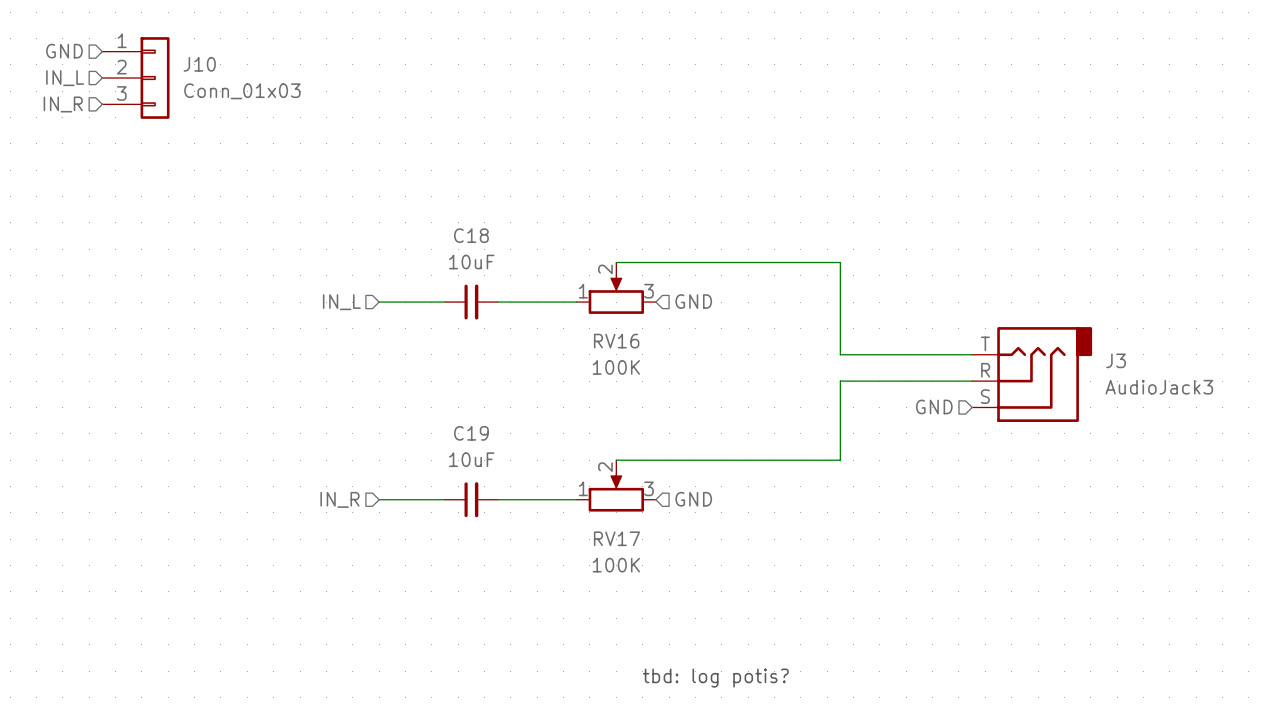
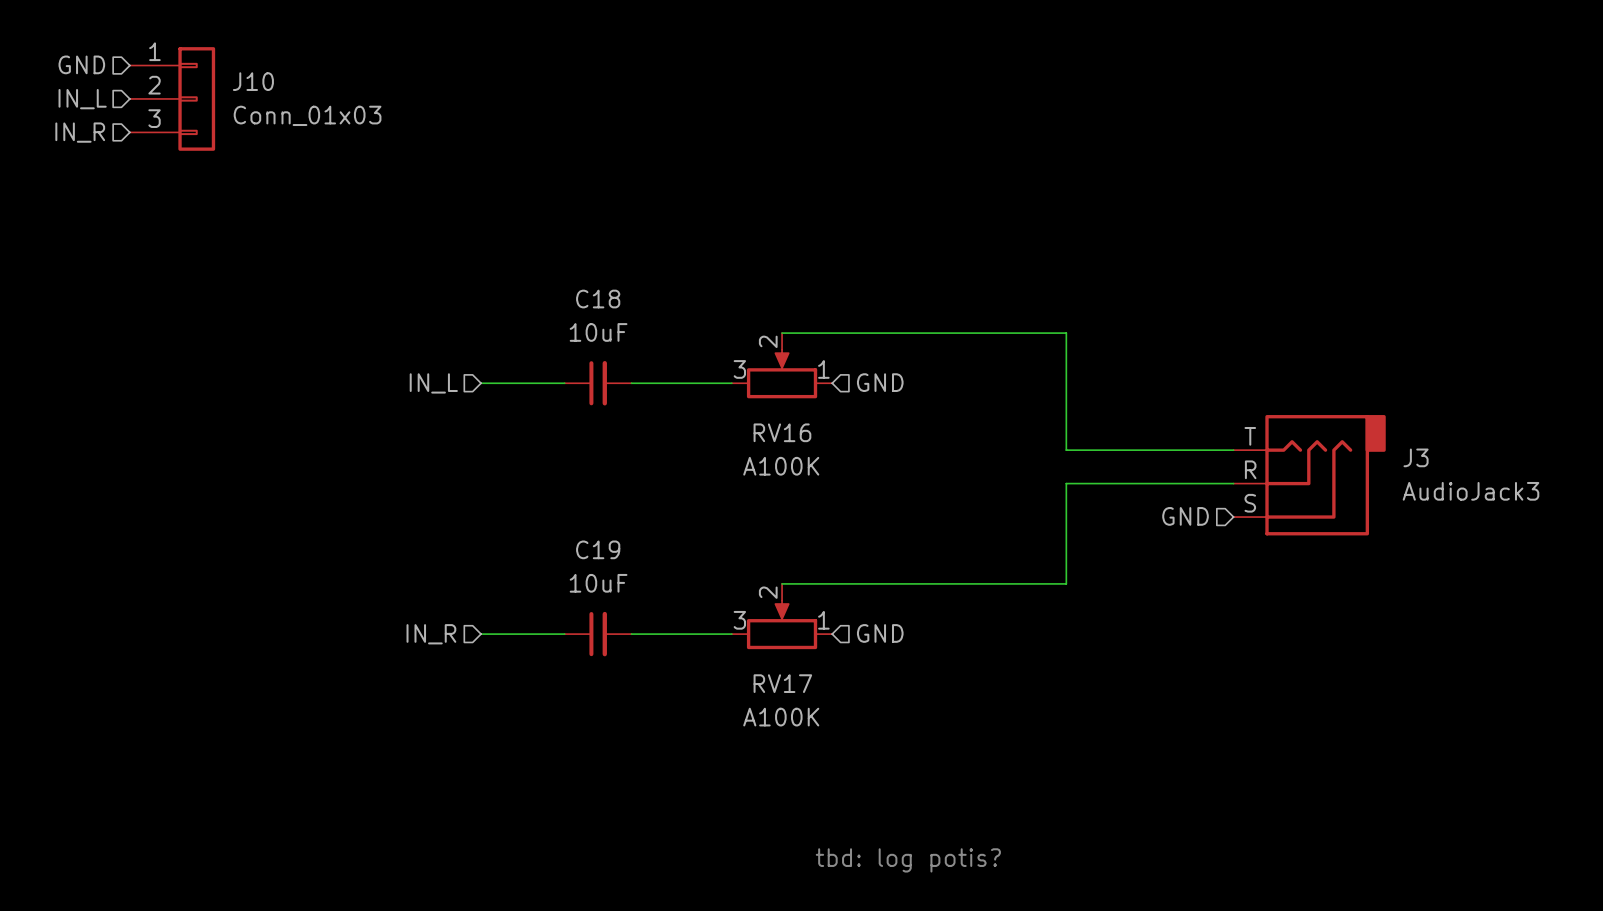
RV16 flip: as is (616, 294) -> left-right (782, 374)
RV16 value: 100K (616, 367) -> A100K (781, 466)
RV17 flip: as is (616, 492) -> left-right (782, 624)
RV17 value: 100K (616, 565) -> A100K (781, 717)

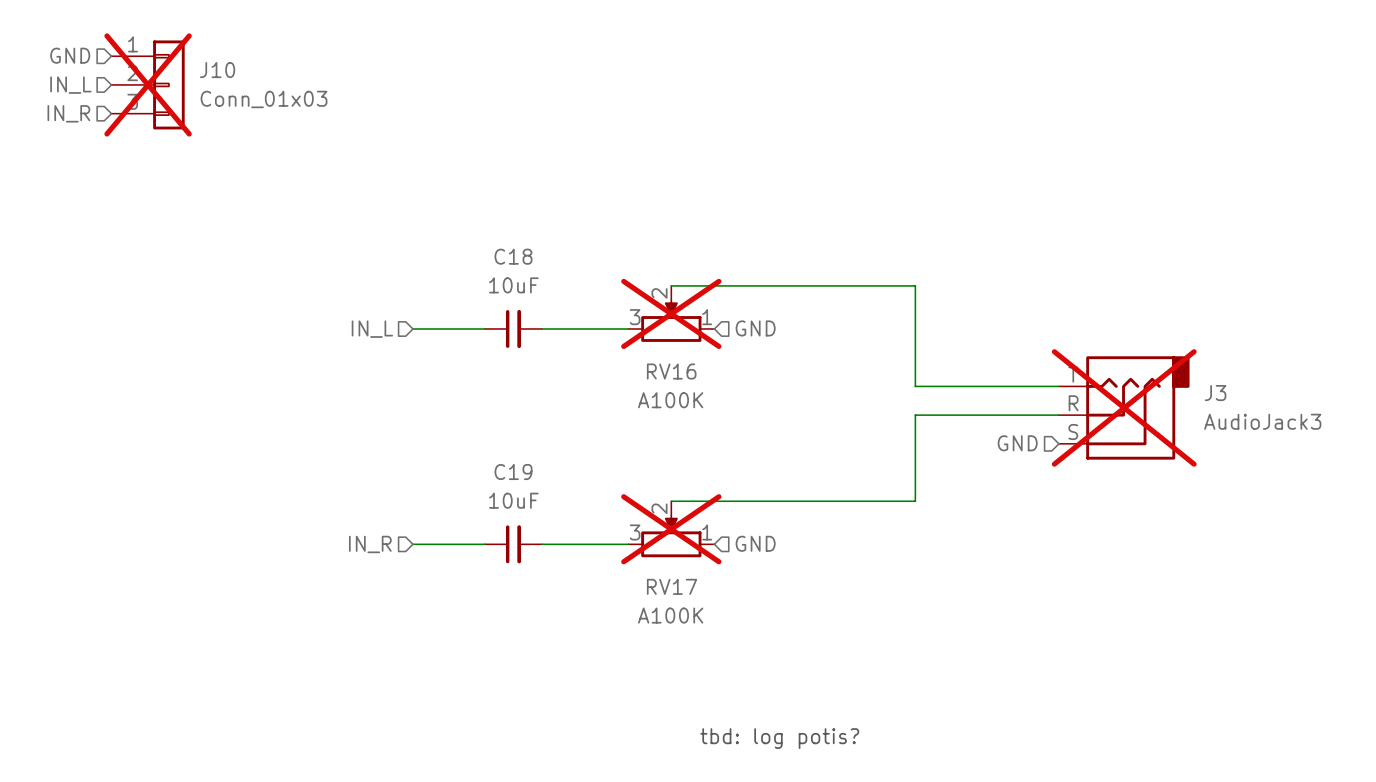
J10 do-not-place cross: none -> (148, 84)
RV16 do-not-place cross: none -> (671, 313)
J3 do-not-place cross: none -> (1124, 407)
RV17 do-not-place cross: none -> (671, 529)

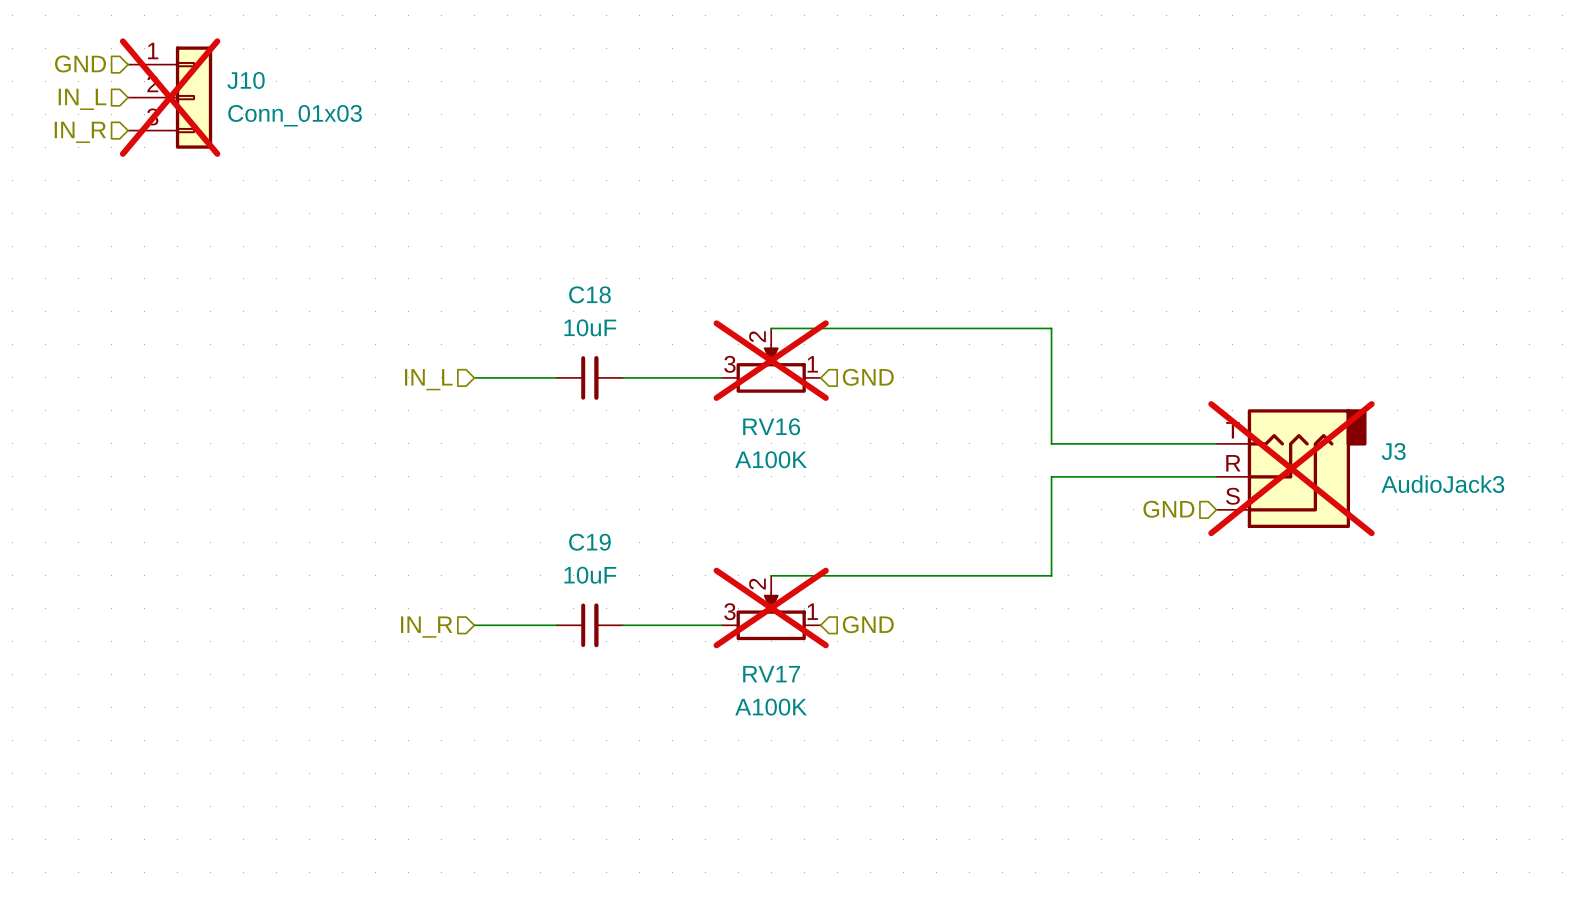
text: tbd: log potis? (779, 738) -> none

